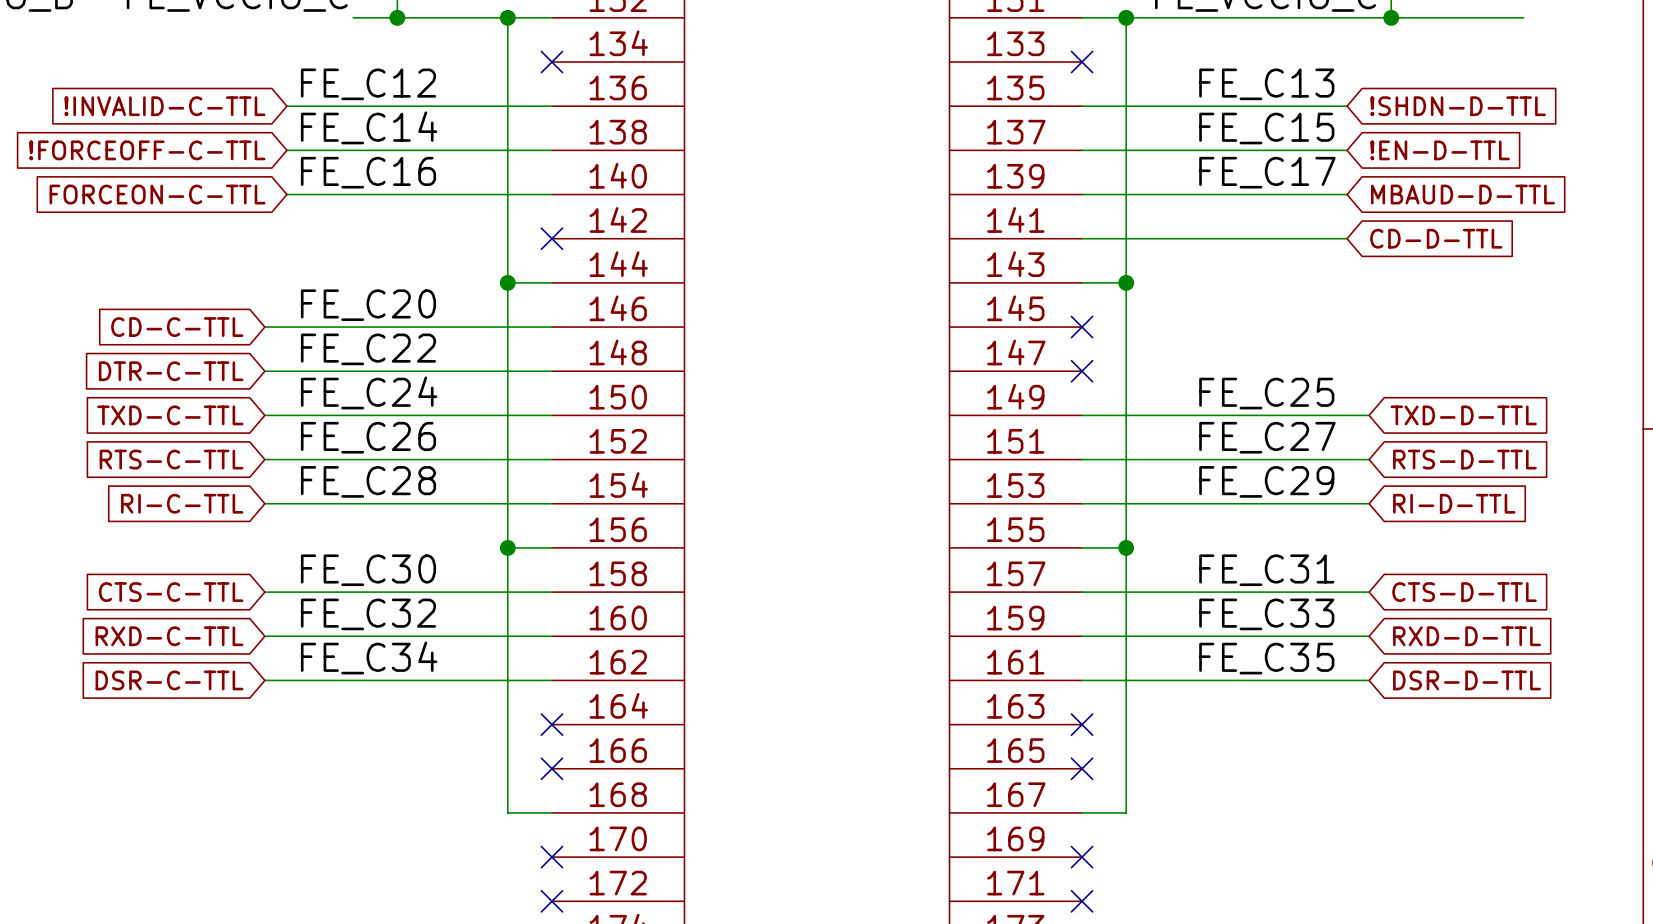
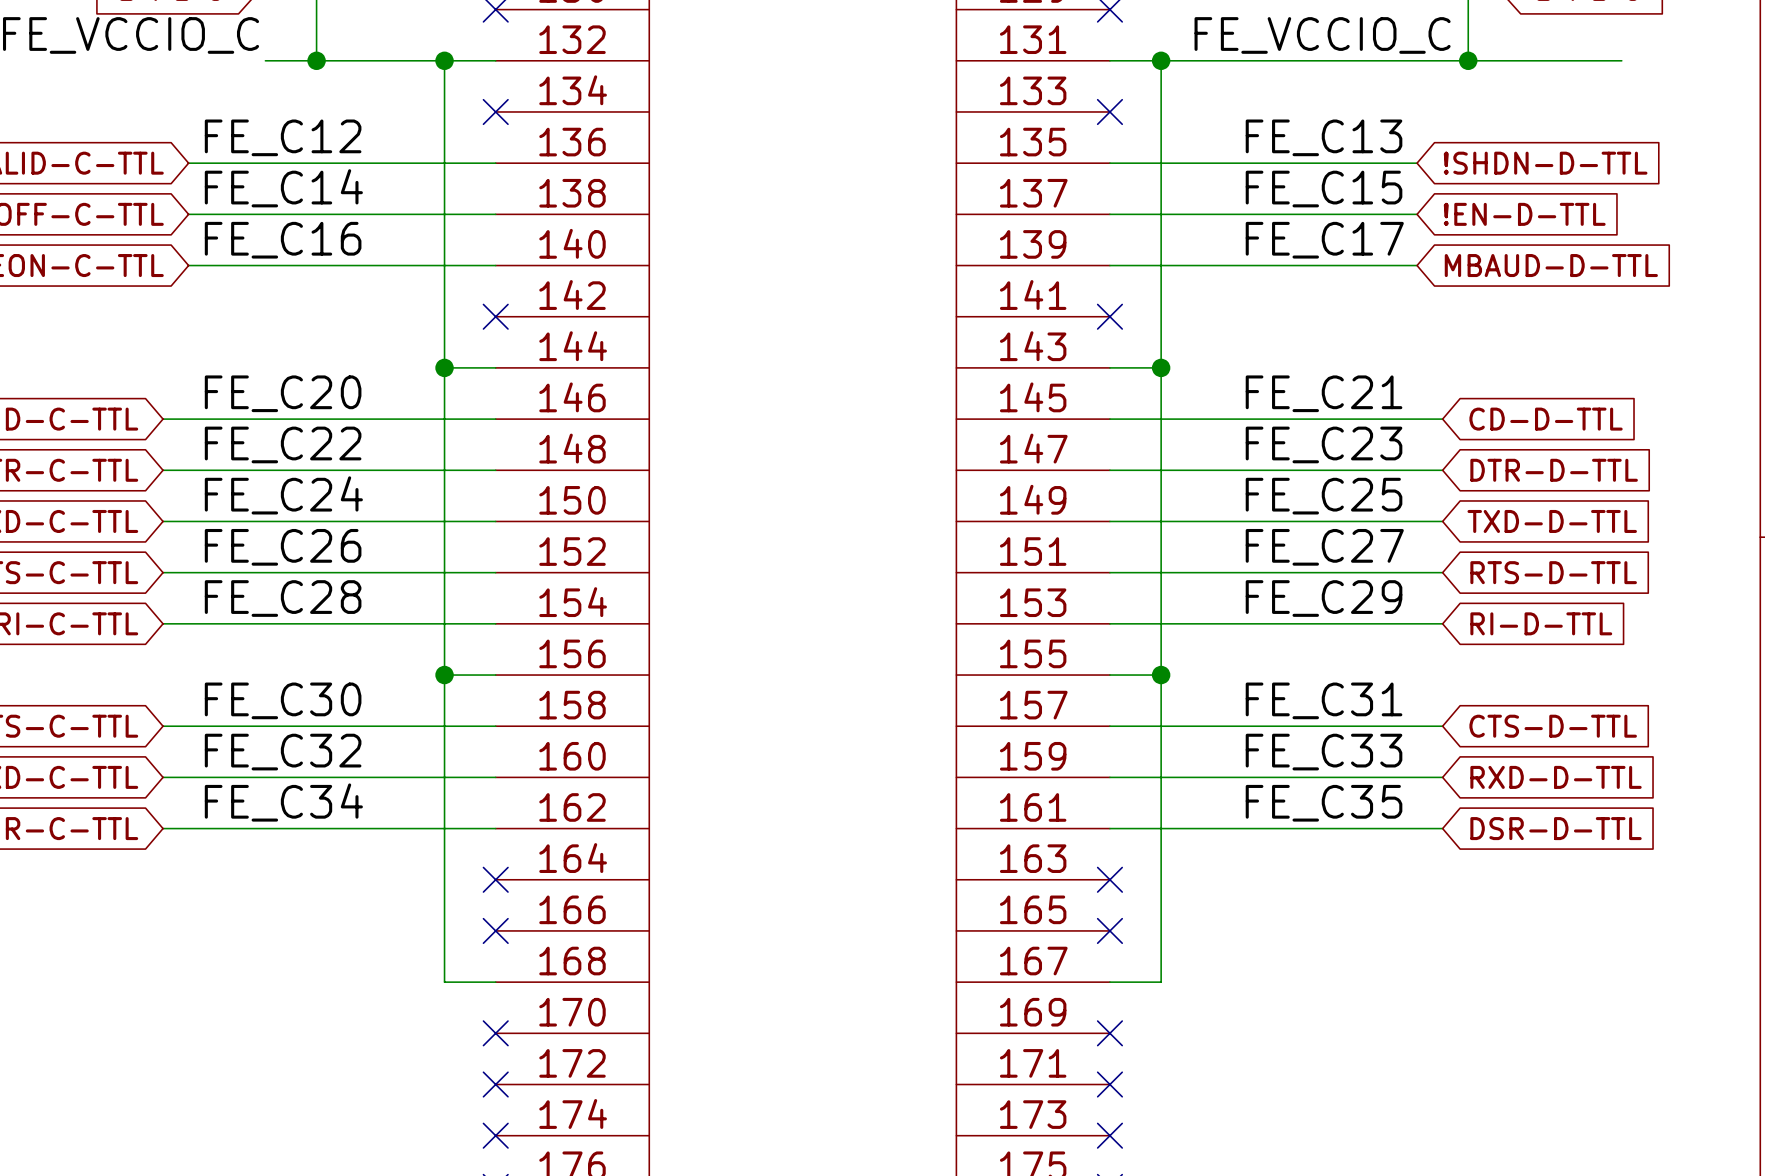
wire: (1082, 238) (1347, 238) -> none
no-connect mark: none -> (1109, 316)
global label position: CD-D-TTL (1436, 238) -> CD-D-TTL (1546, 419)
label: none -> FE_C21 (1324, 393)
wire: none -> (1109, 419) (1442, 419)
no-connect mark: (1082, 327) -> none
label: none -> FE_C23 (1324, 444)
wire: none -> (1109, 470) (1442, 470)
no-connect mark: (1082, 371) -> none
global label: none -> DTR-D-TTL (1554, 470)

